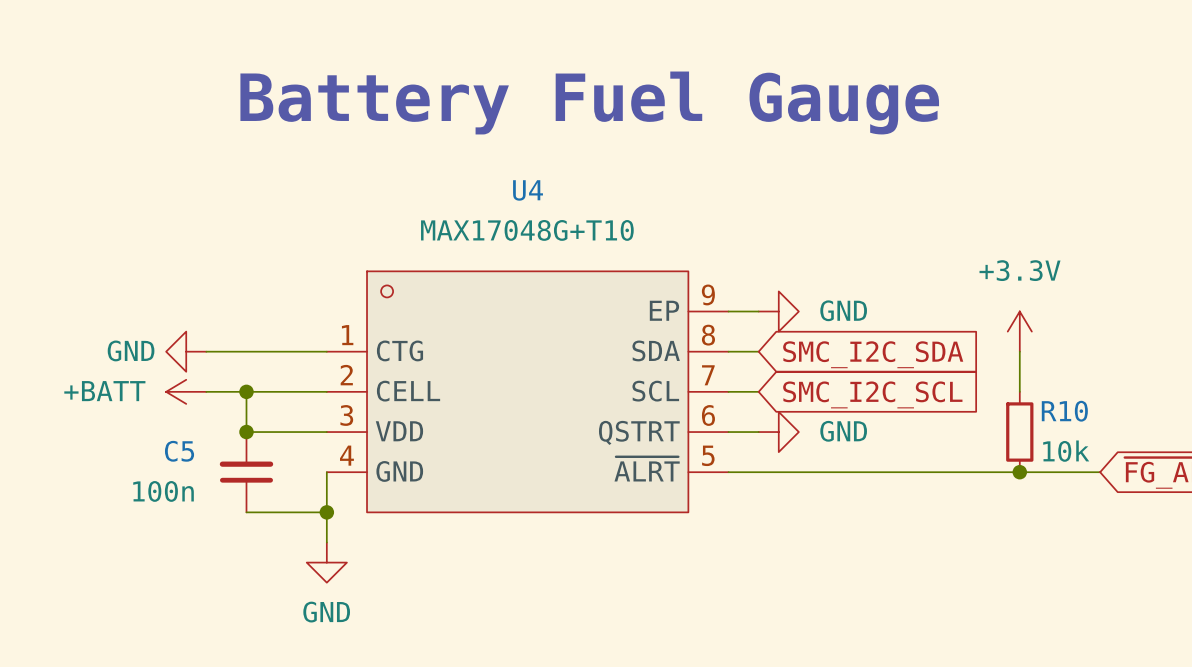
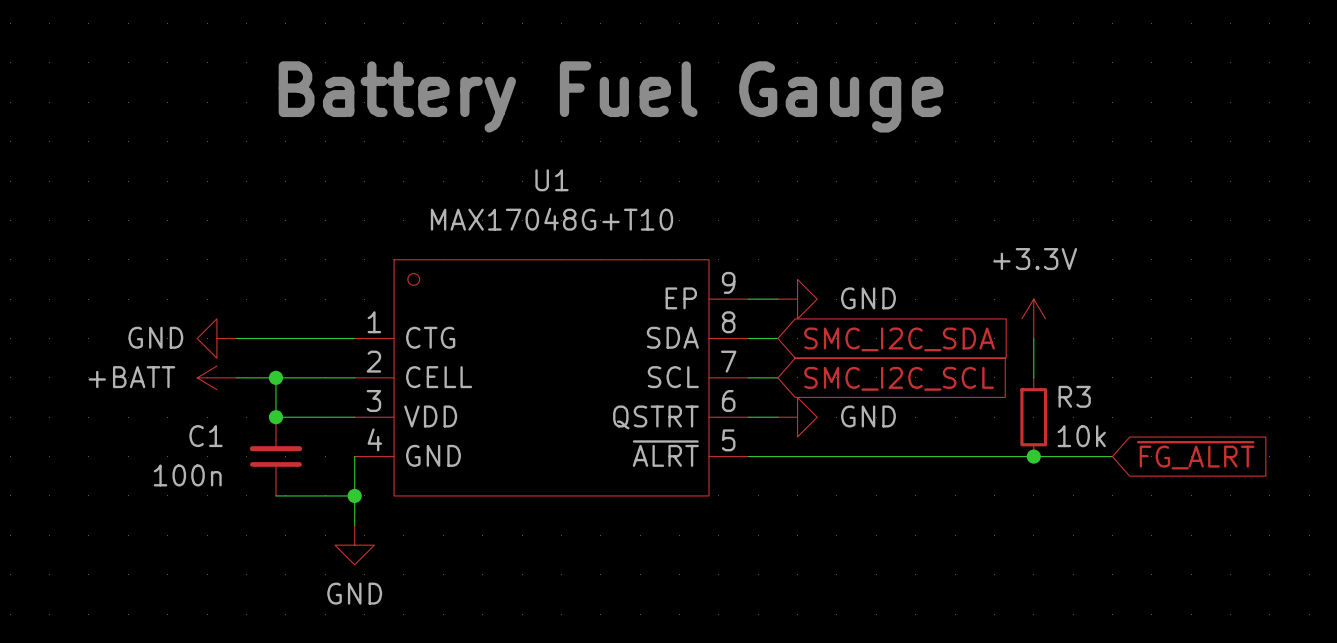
U4 name: U4 (528, 190) -> U1 (551, 180)
R10 name: R10 (1064, 411) -> R3 (1074, 396)
C5 name: C5 (179, 451) -> C1 (205, 436)

